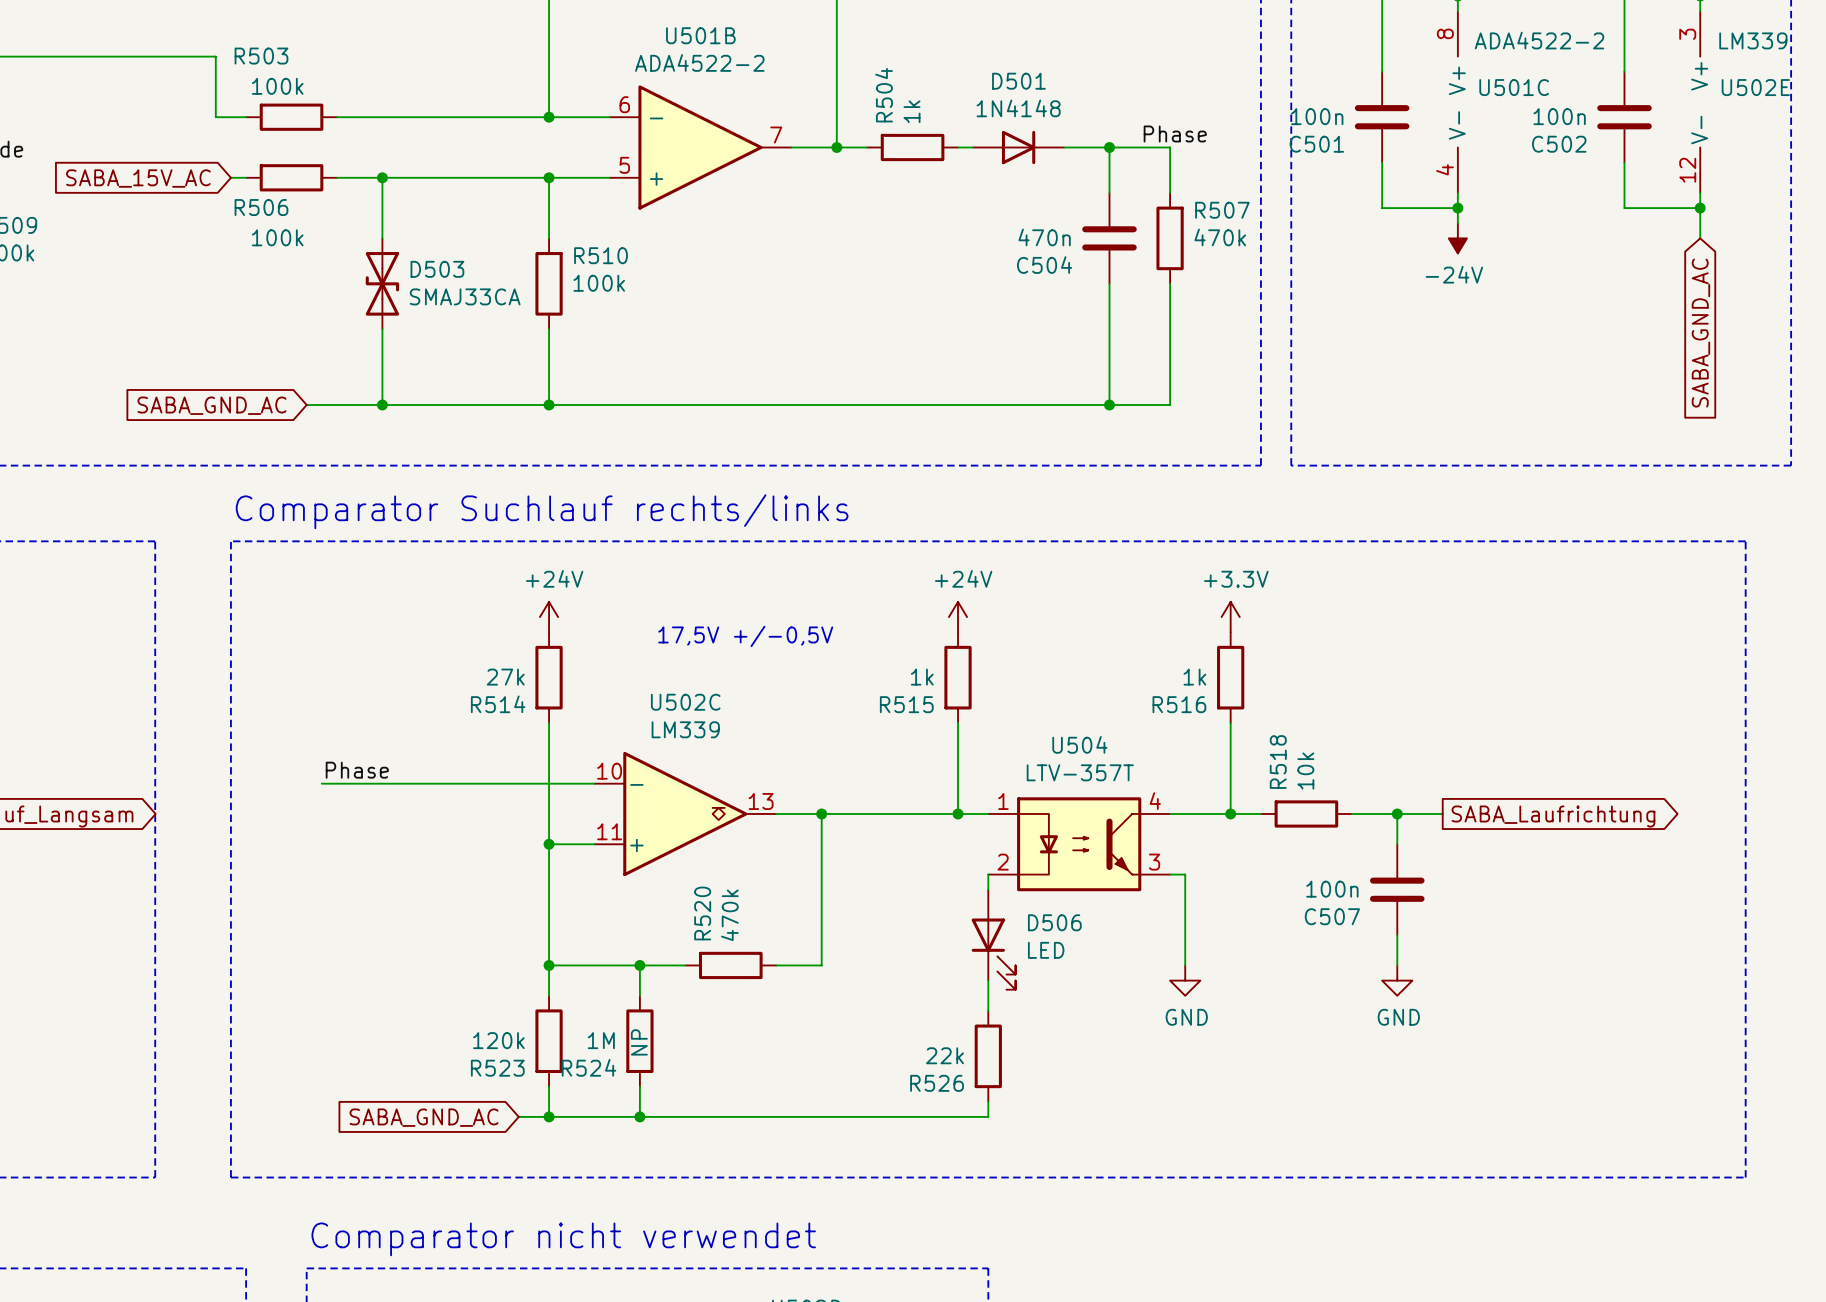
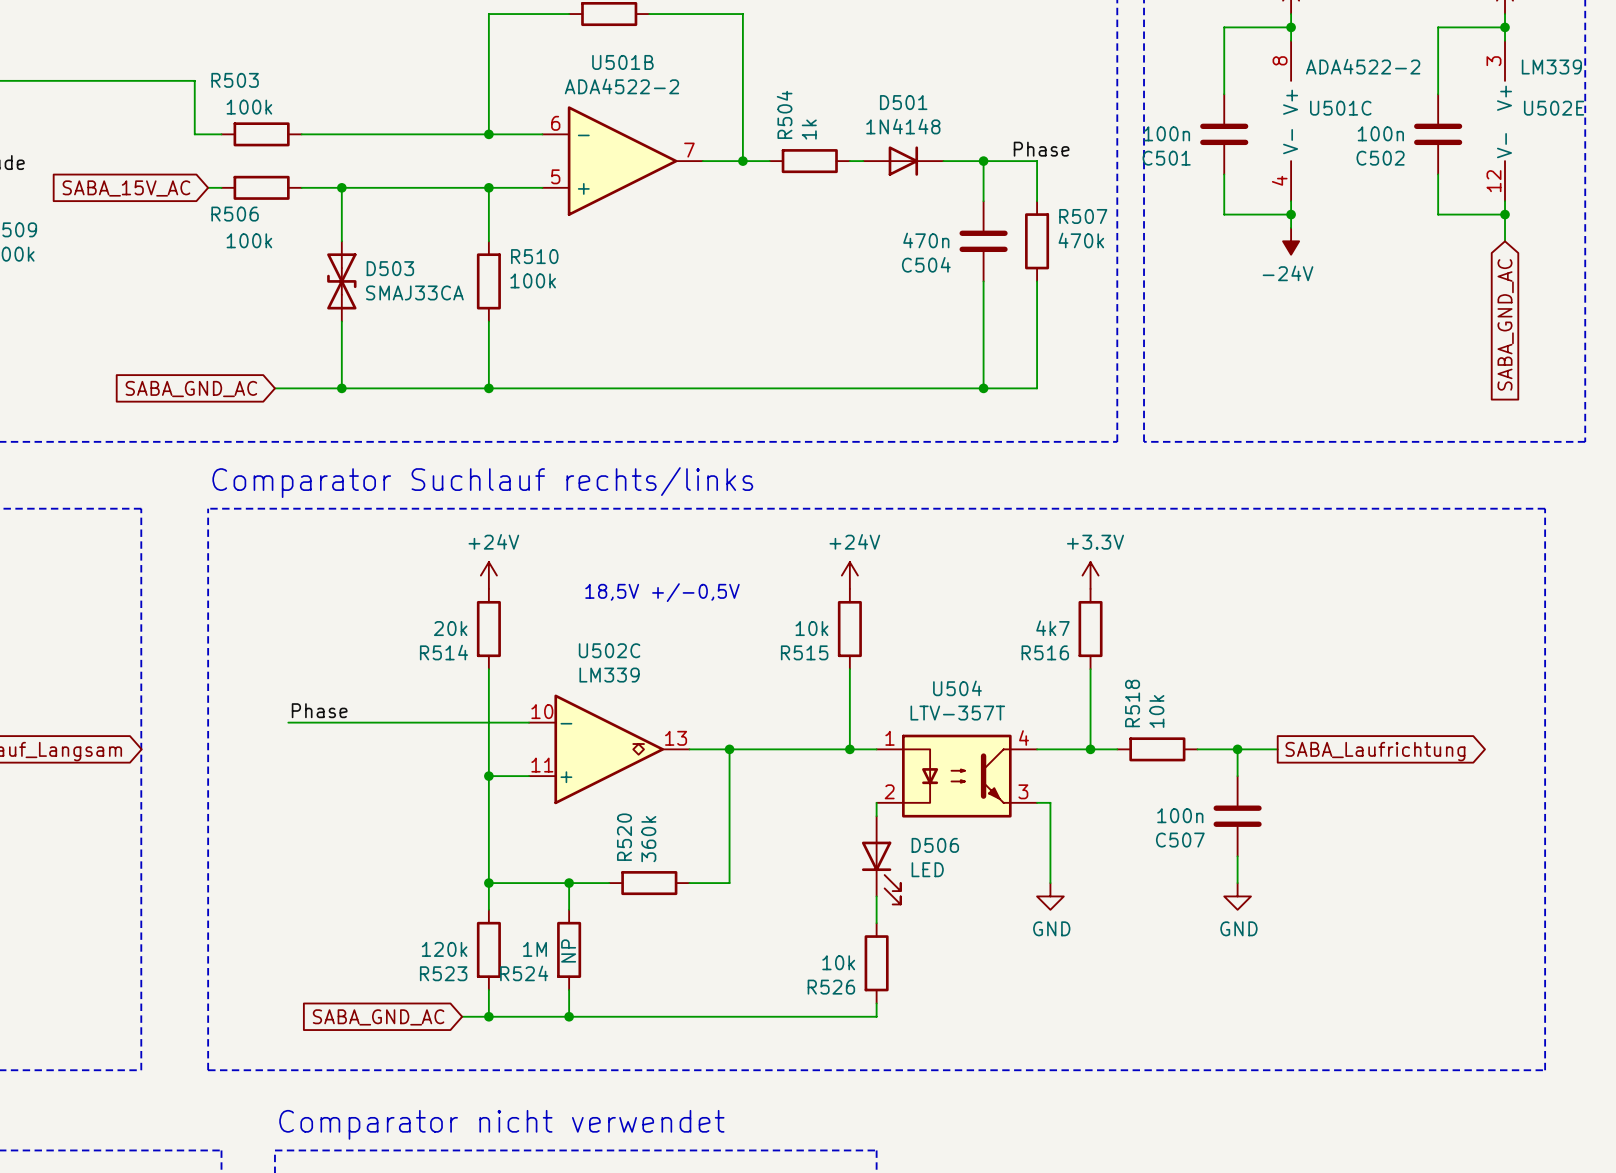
text: 17,5V +/-0,5V (745, 636) -> 18,5V +/-0,5V (662, 592)
R514 value: 27k (505, 677) -> 20k (450, 628)
R515 value: 1k (922, 677) -> 10k (811, 628)
R516 value: 1k (1194, 677) -> 4k7 (1052, 628)
R520 value: 470k (729, 915) -> 360k (648, 839)
R526 value: 22k (944, 1055) -> 10k (838, 962)

